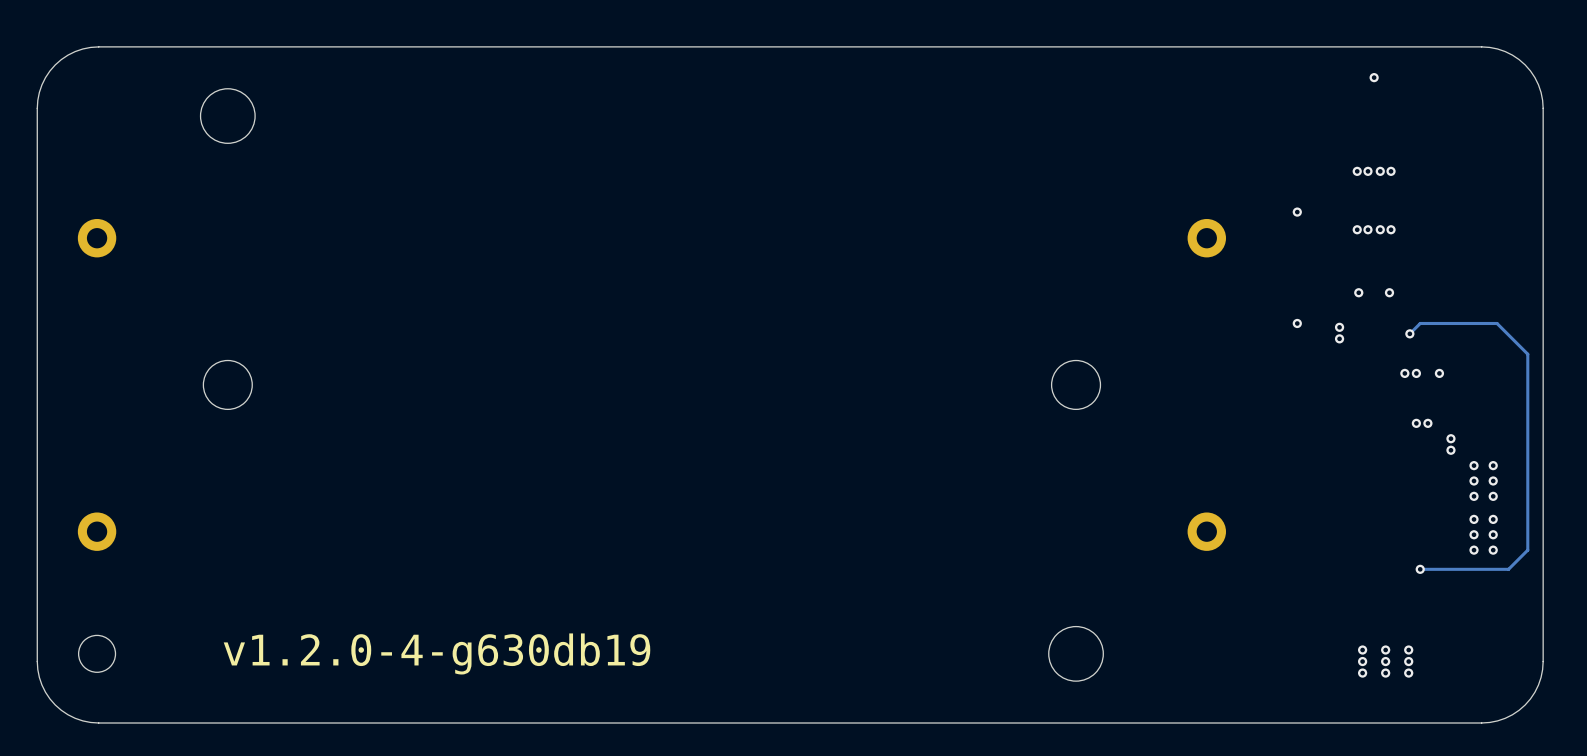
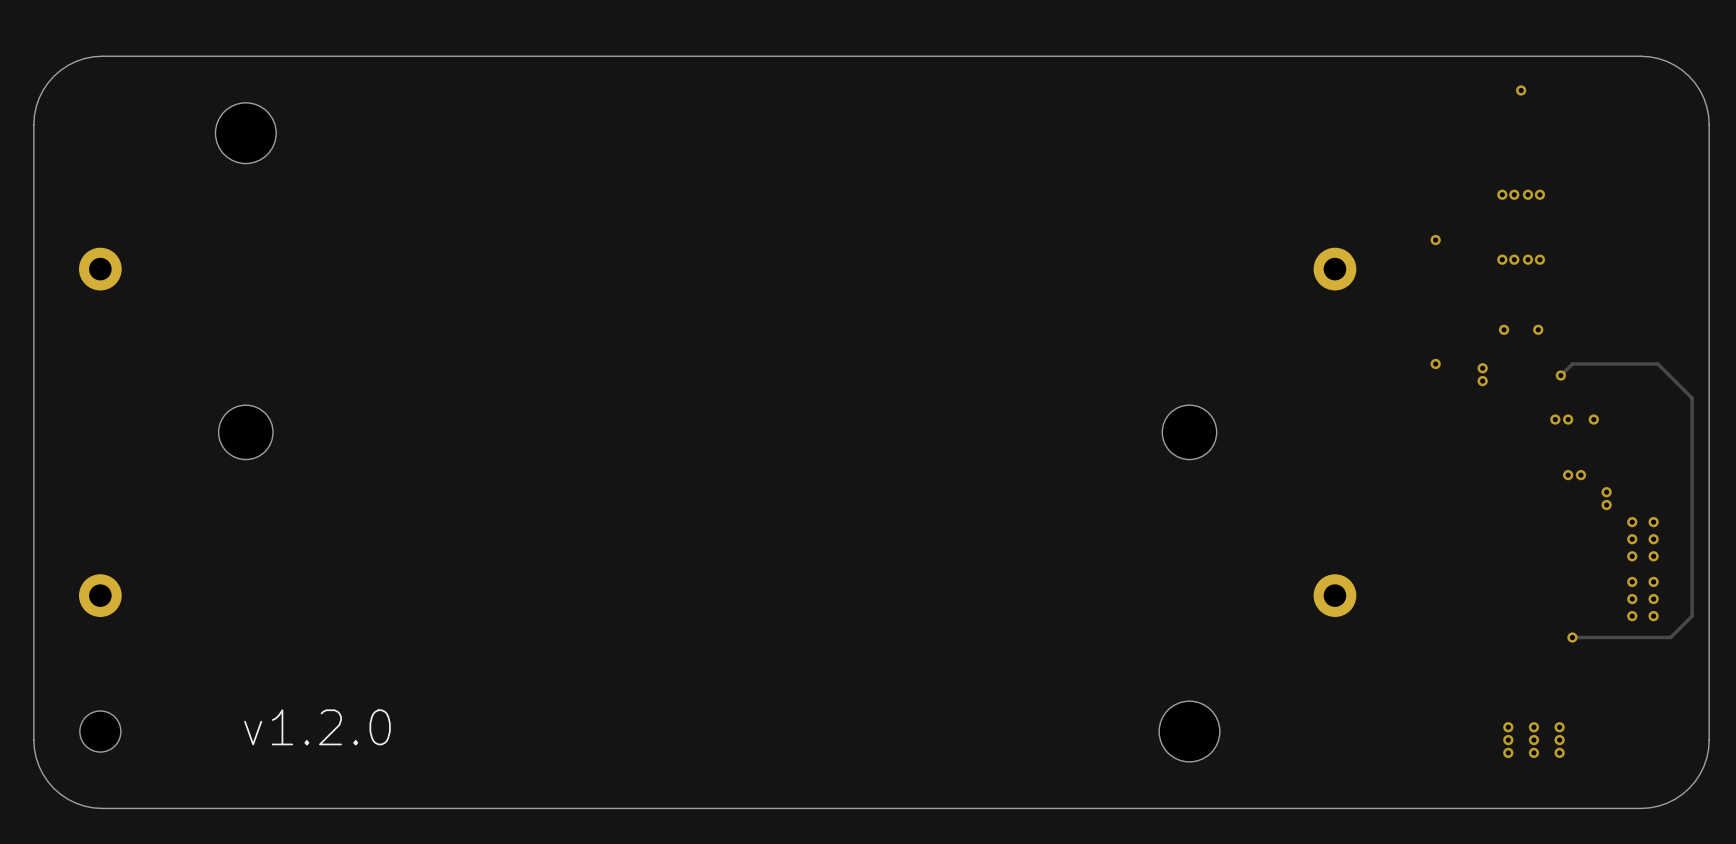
text: v1.2.0-4-g630db19 (436, 653) -> v1.2.0 (317, 727)

